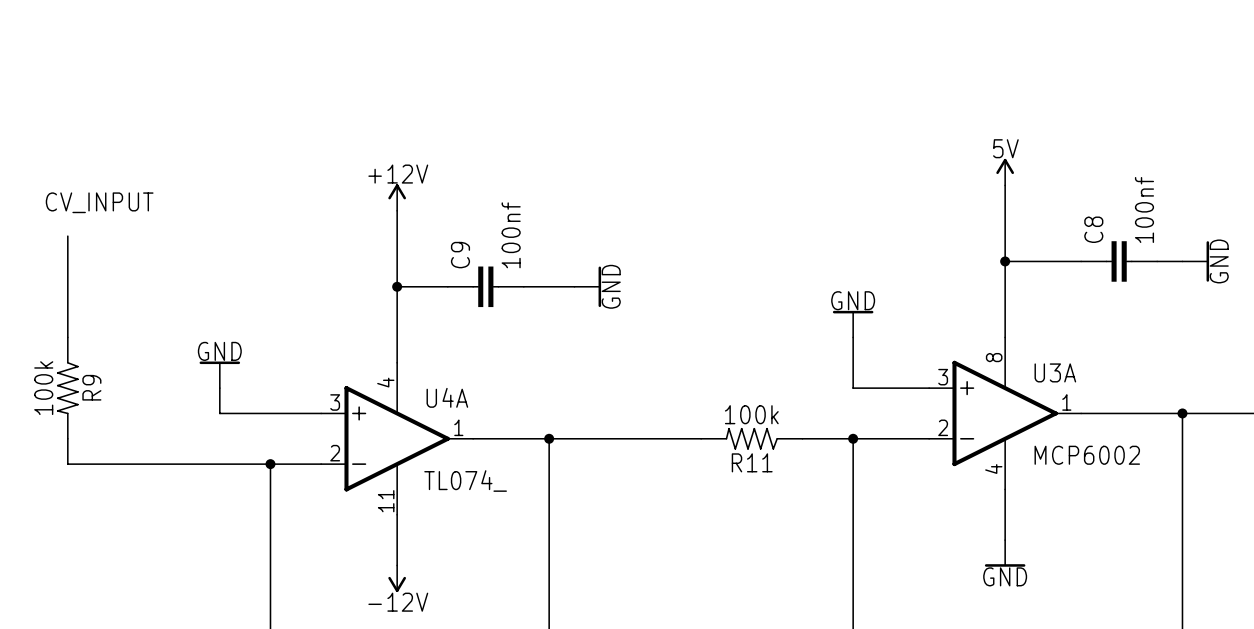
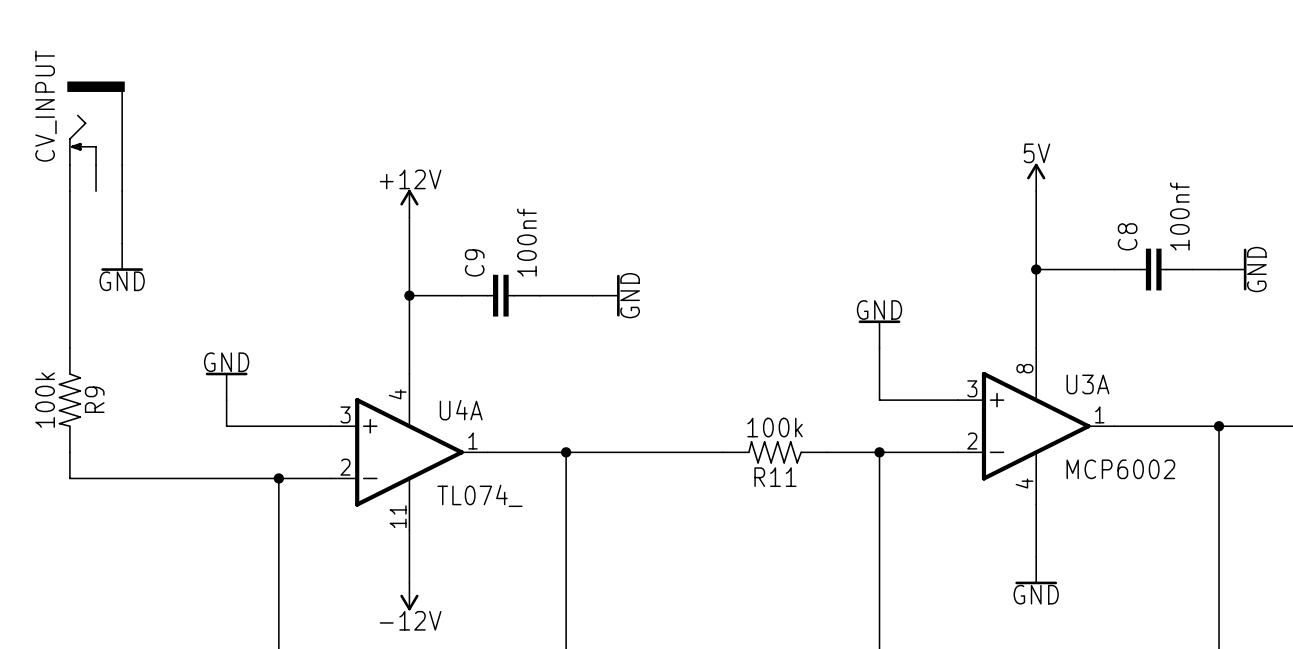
CV_INPUT: none -> (96, 136)
wire: none -> (69, 191) (69, 243)
wire: none -> (122, 191) (122, 243)
label: CV_INPUT (99, 202) -> none
power symbol: none -> GND (122, 257)

